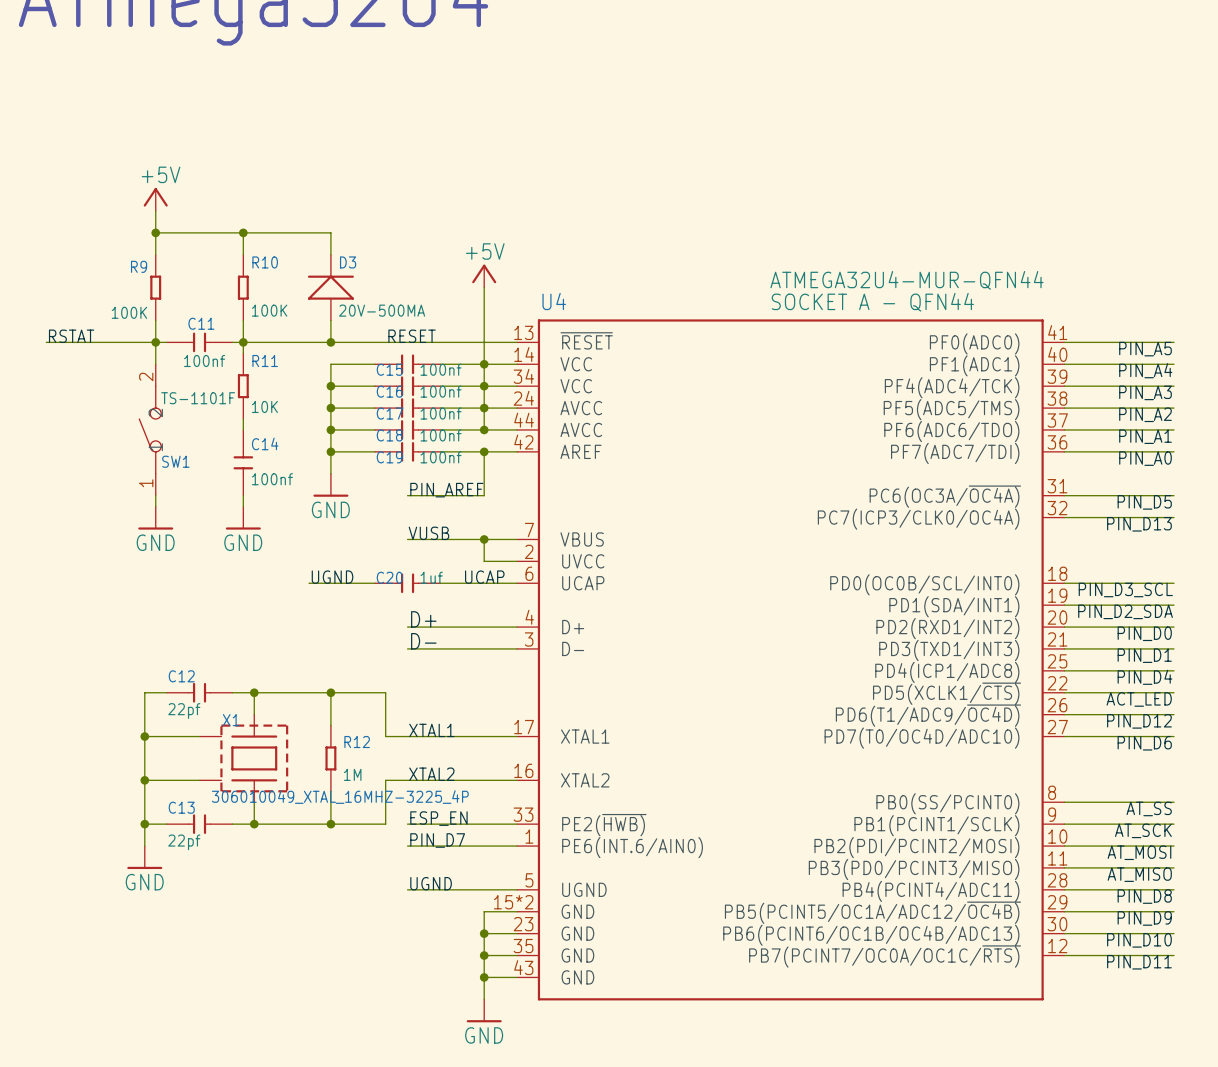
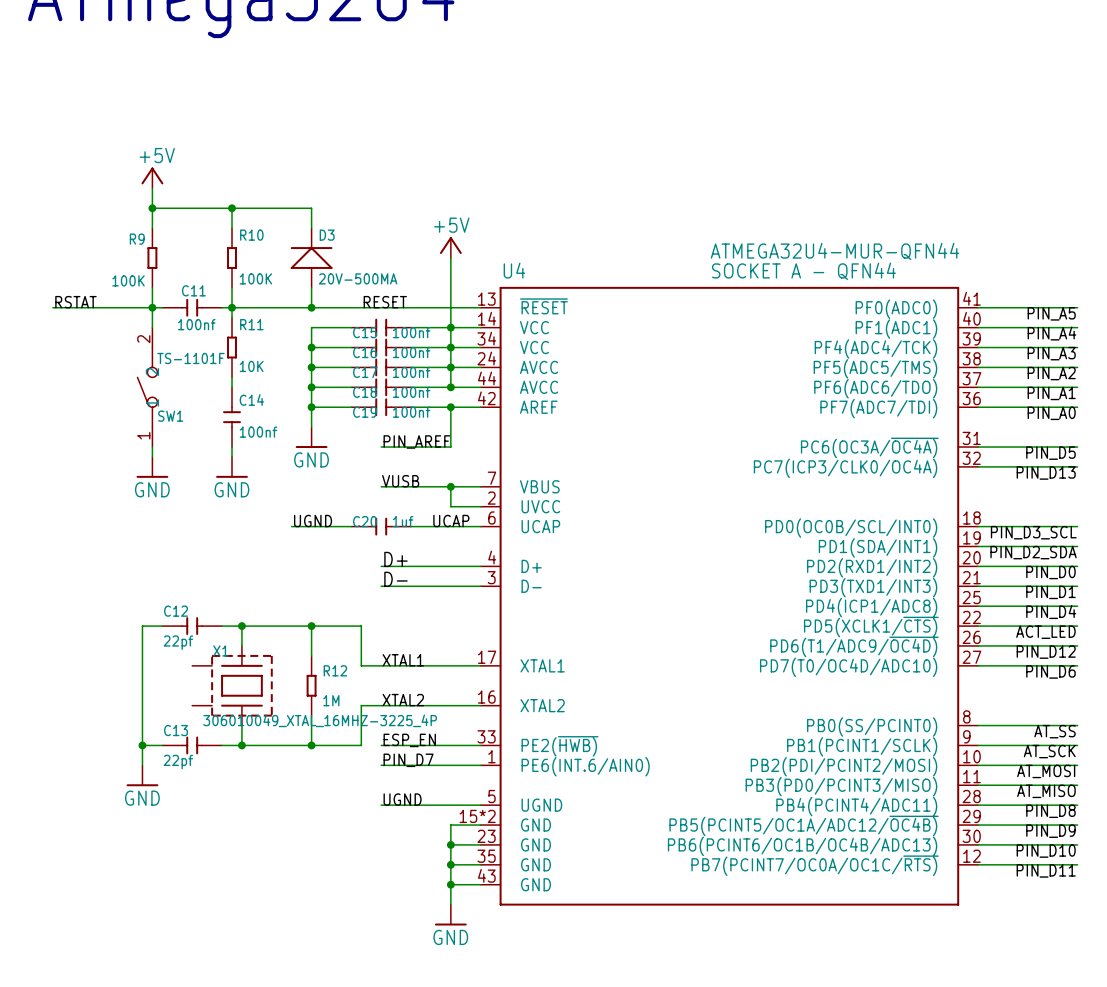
wire: (144, 736) (199, 736) -> none
junction: (144, 736) -> none
wire: (144, 780) (199, 780) -> none
junction: (144, 780) -> none

